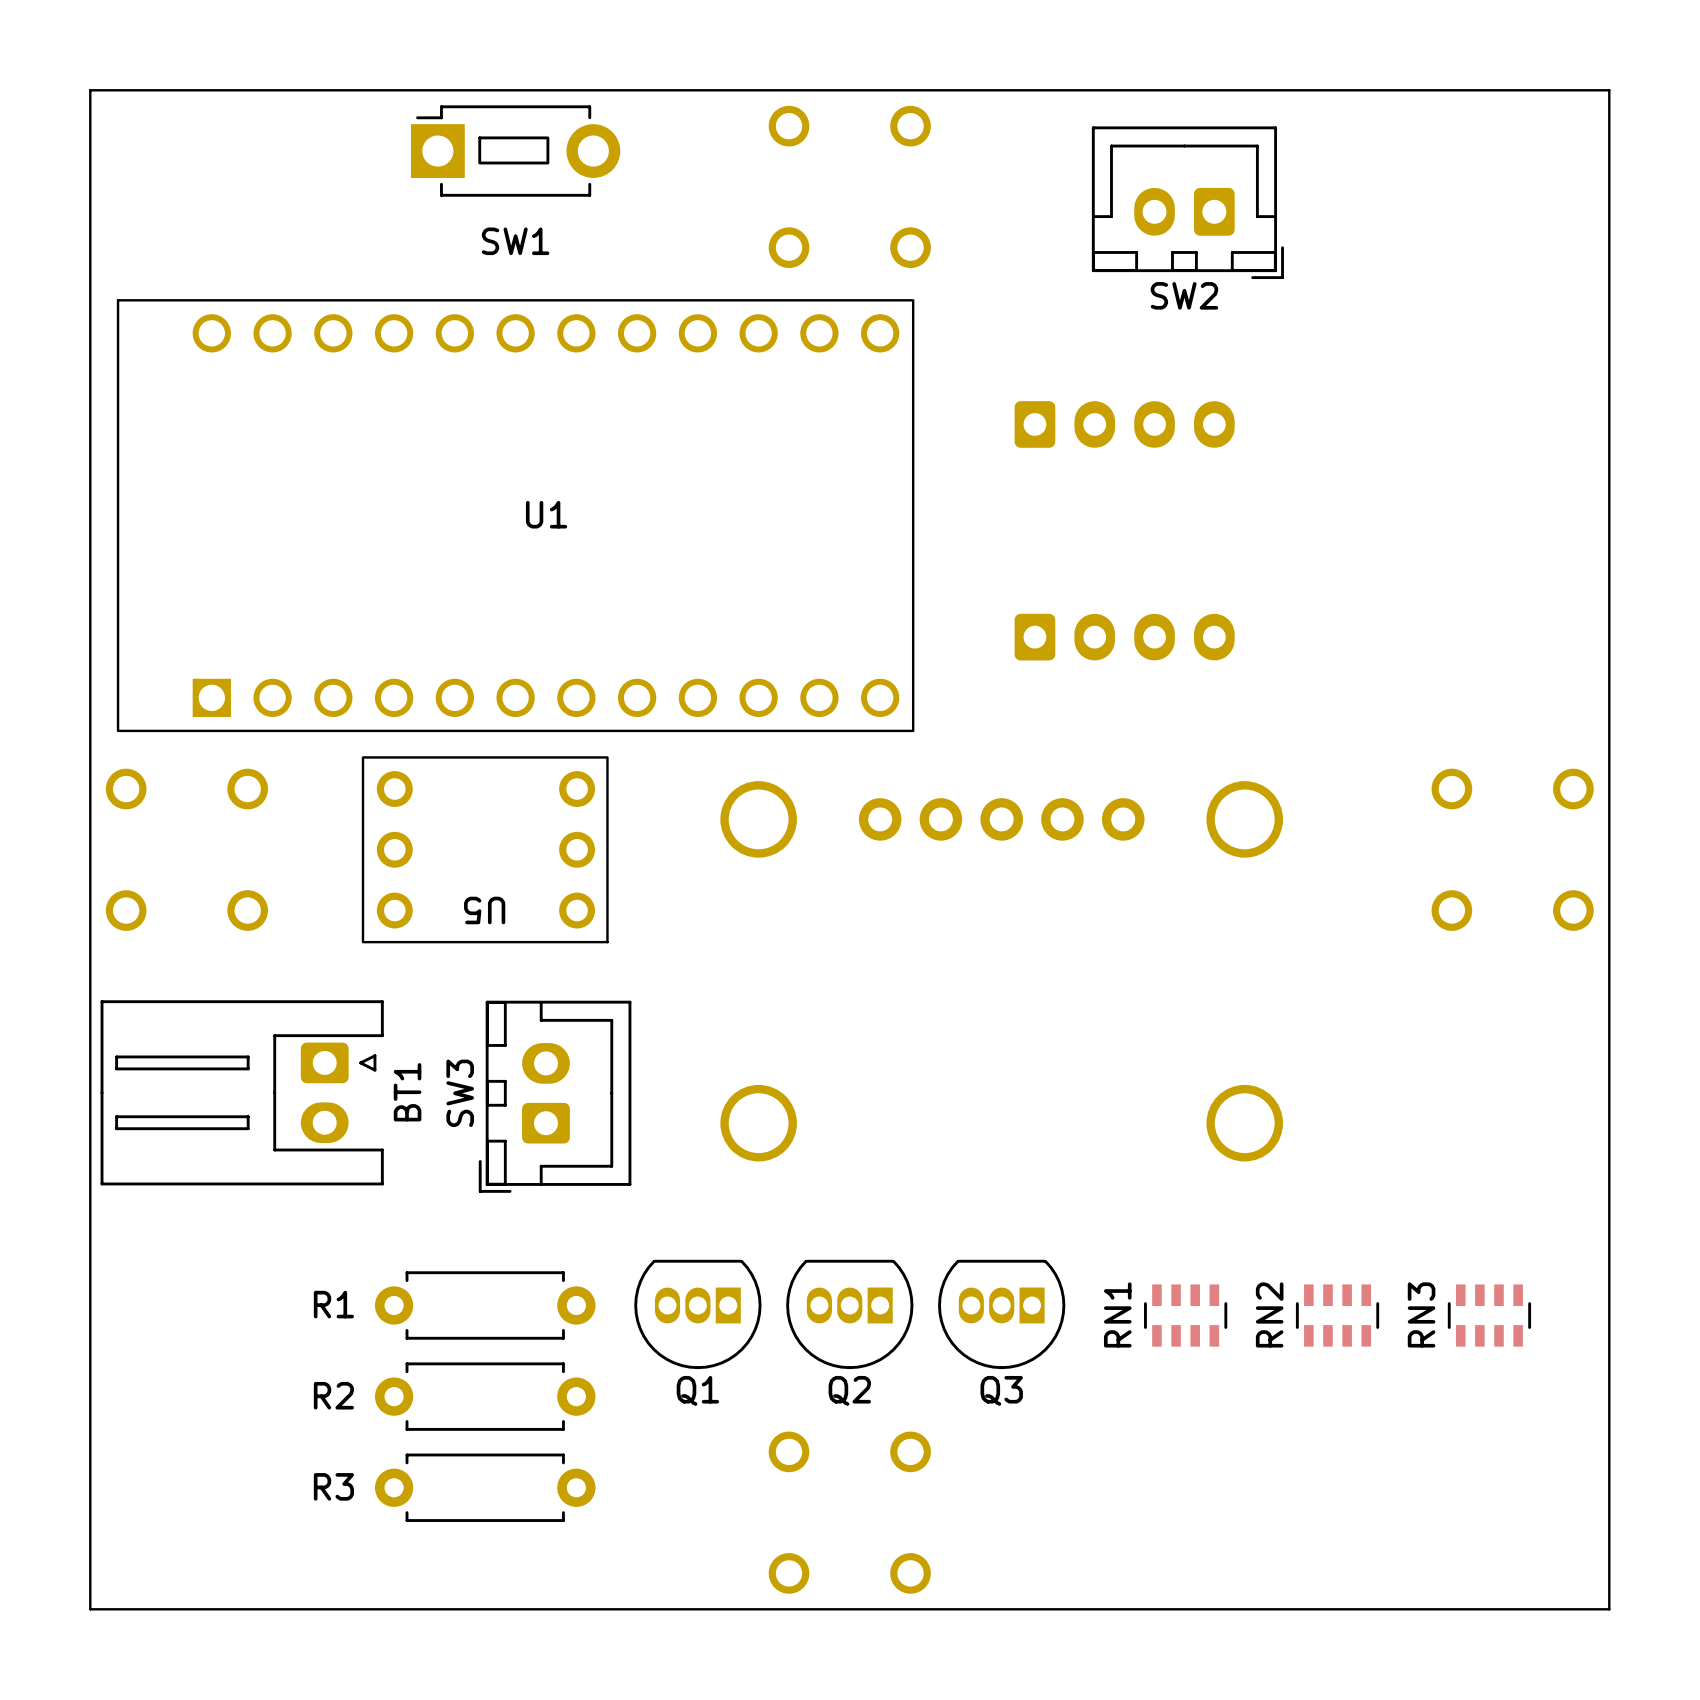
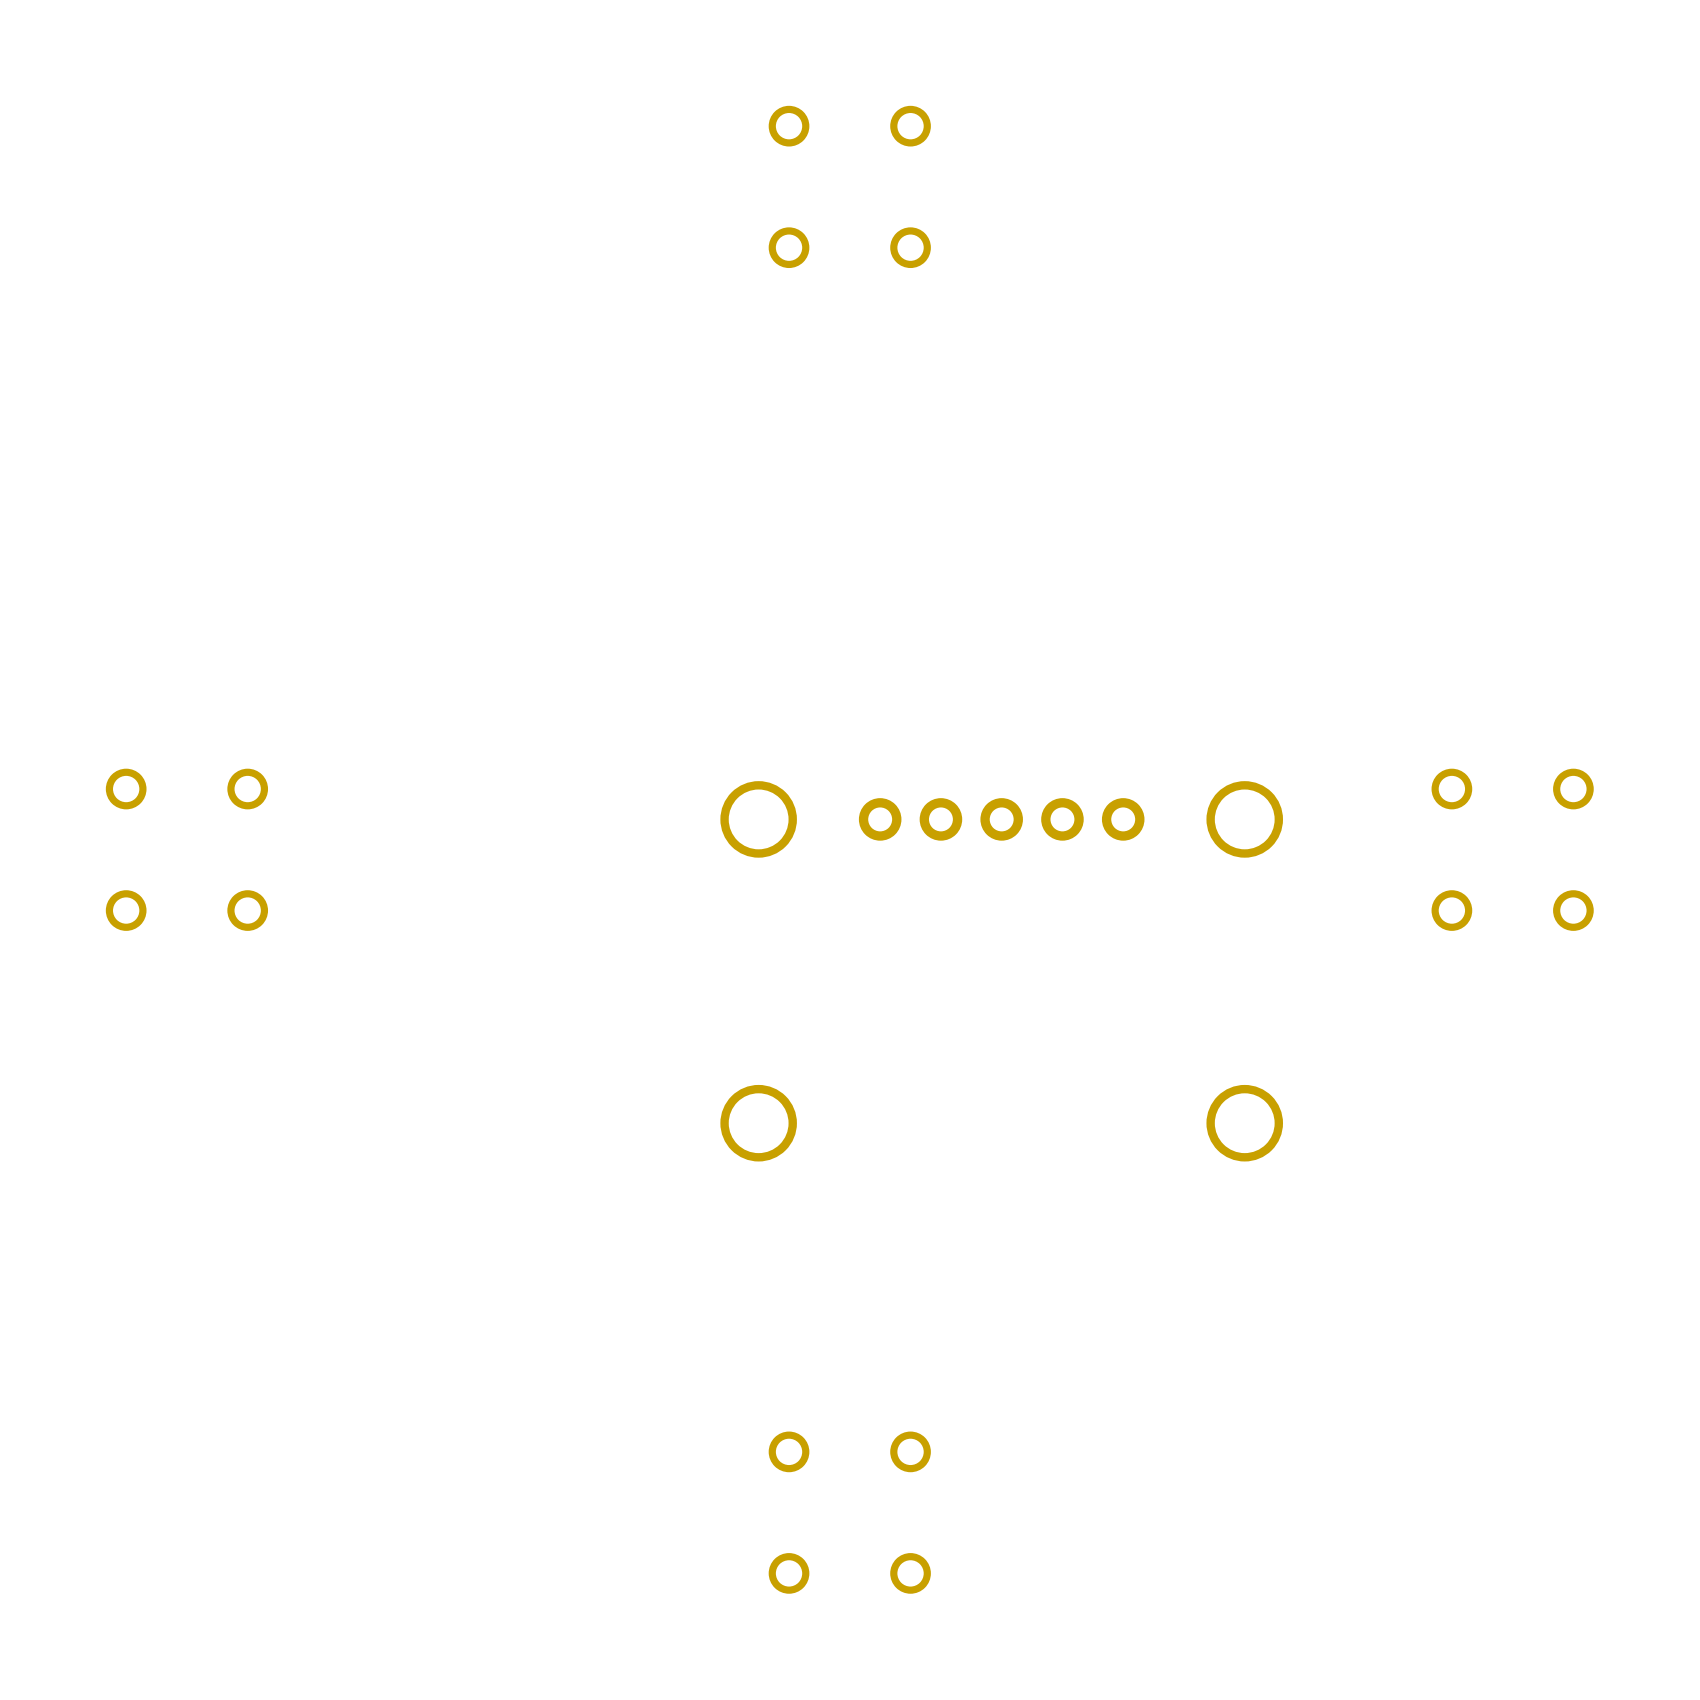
board edge: (90, 90) (1609, 90) (1609, 1609) (90, 1609) (90, 90) -> none
SW1: (515, 151) -> none
SW2: (1187, 202) -> none
part: (1124, 424) -> none
U1: (515, 515) -> none
part: (1124, 637) -> none
U5: (485, 849) -> none
BT1: (242, 1092) -> none
SW3: (555, 1096) -> none
R1: (485, 1305) -> none
Q1: (697, 1314) -> none
Q2: (849, 1314) -> none
Q3: (1001, 1314) -> none
RN1: (1185, 1315) -> none
RN2: (1337, 1315) -> none
RN3: (1489, 1315) -> none
R2: (485, 1396) -> none
R3: (485, 1487) -> none

